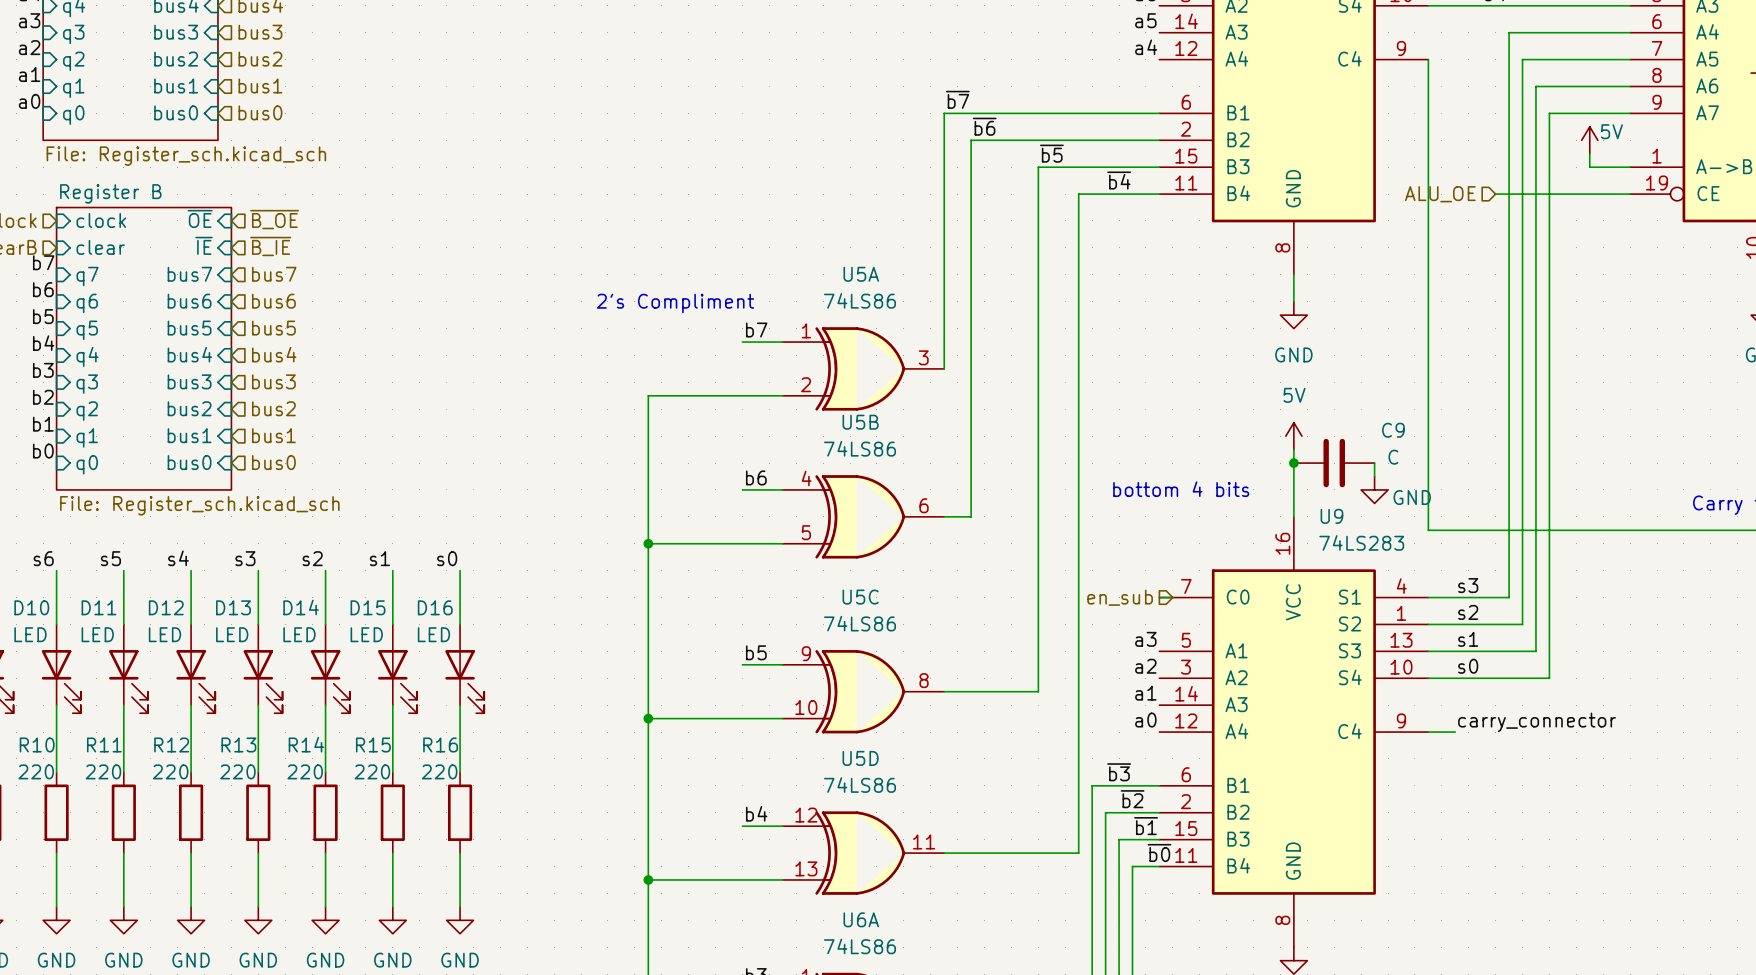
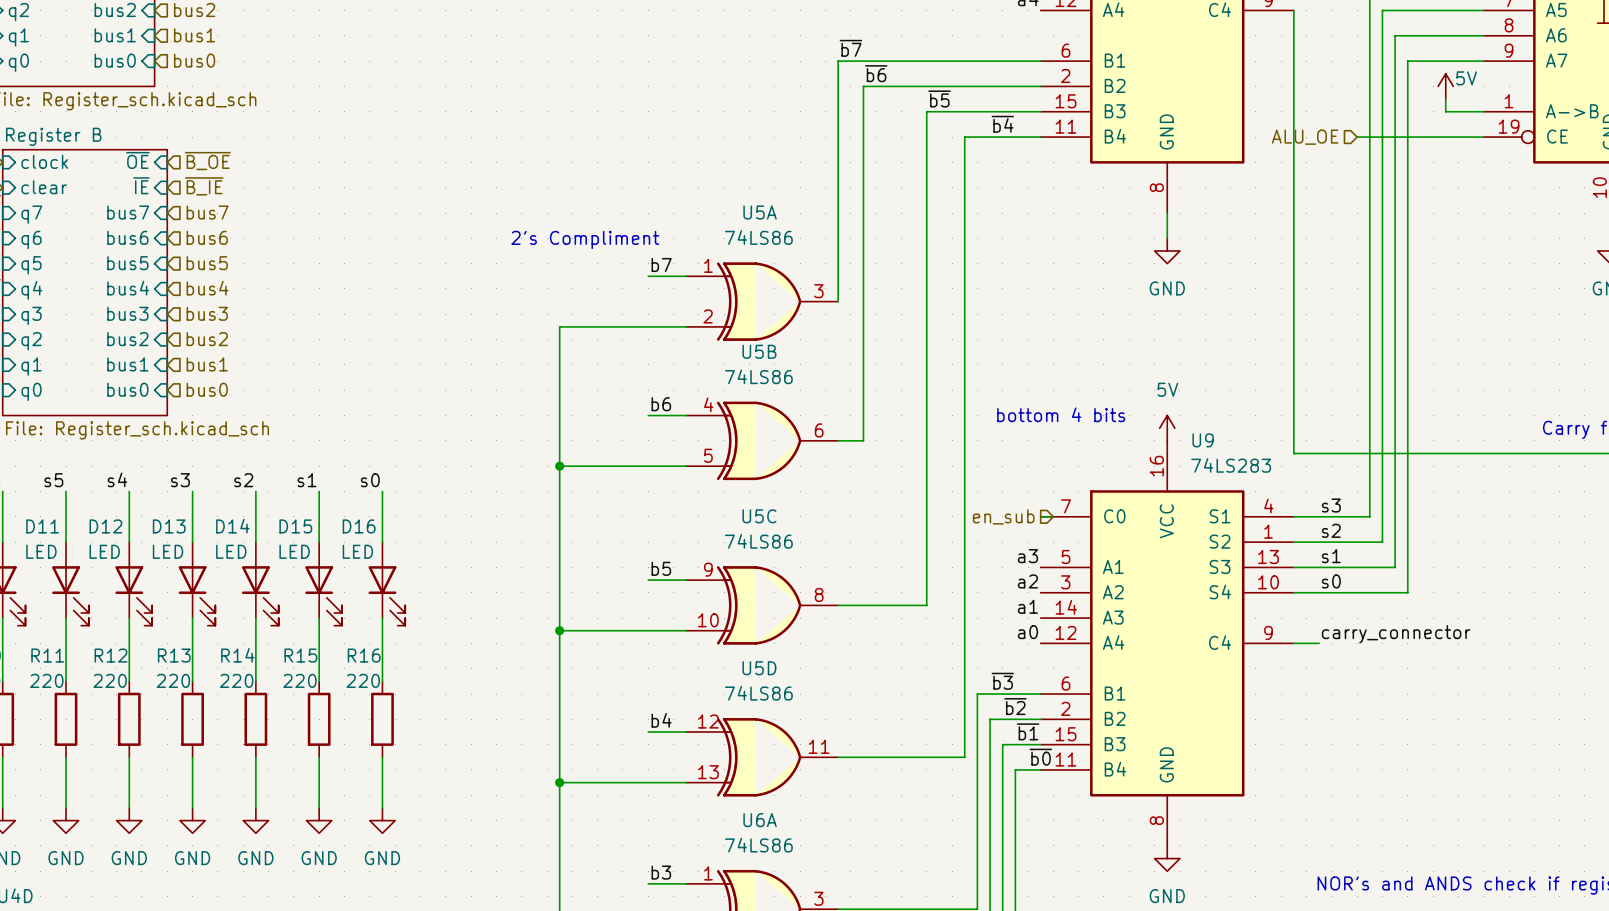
power symbol position: 5V (1293, 436) -> 5V (1167, 428)
wire: (1293, 449) (1293, 516) -> none
junction: (1293, 463) -> none
C9: C (1334, 463) -> none
wire: (1374, 463) (1374, 476) -> none
power symbol: GND (1374, 489) -> none

